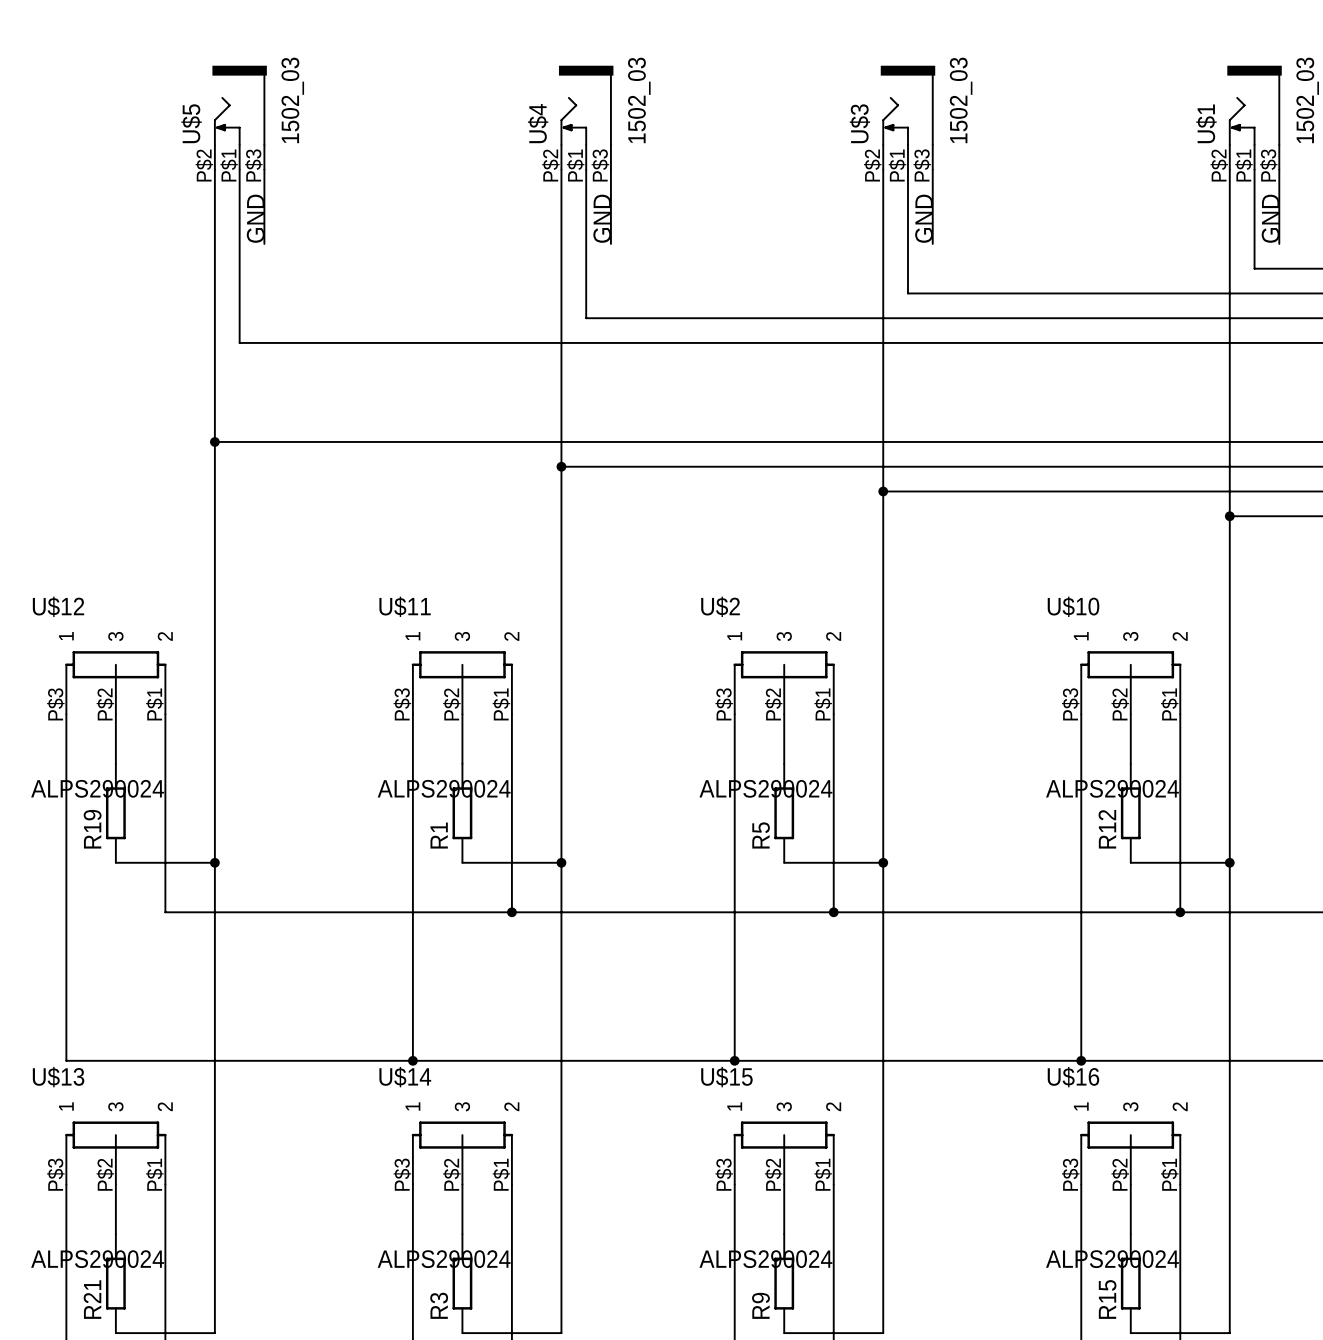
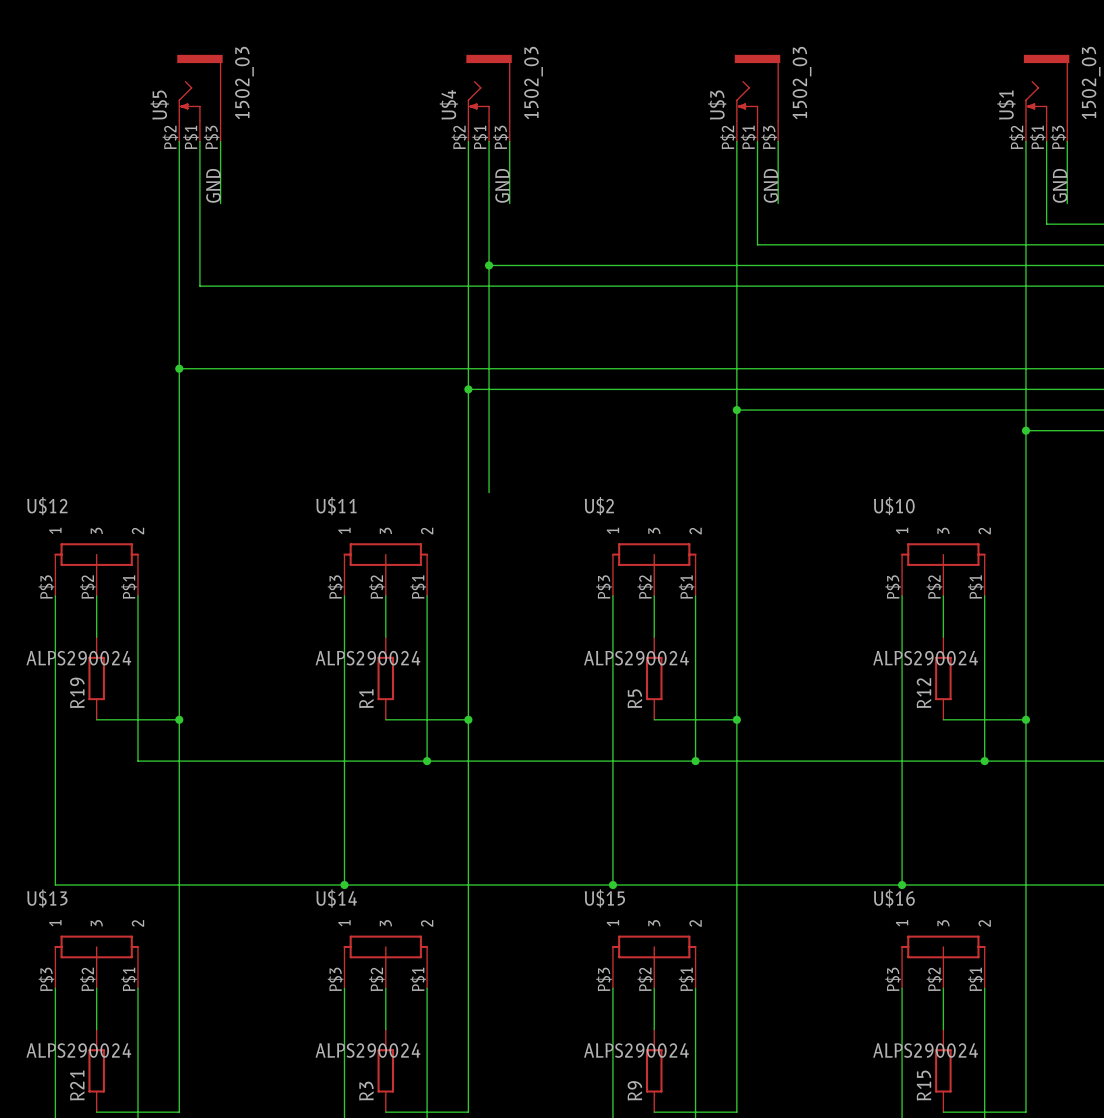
wire: none -> (489, 265) (489, 492)
junction: none -> (489, 265)

